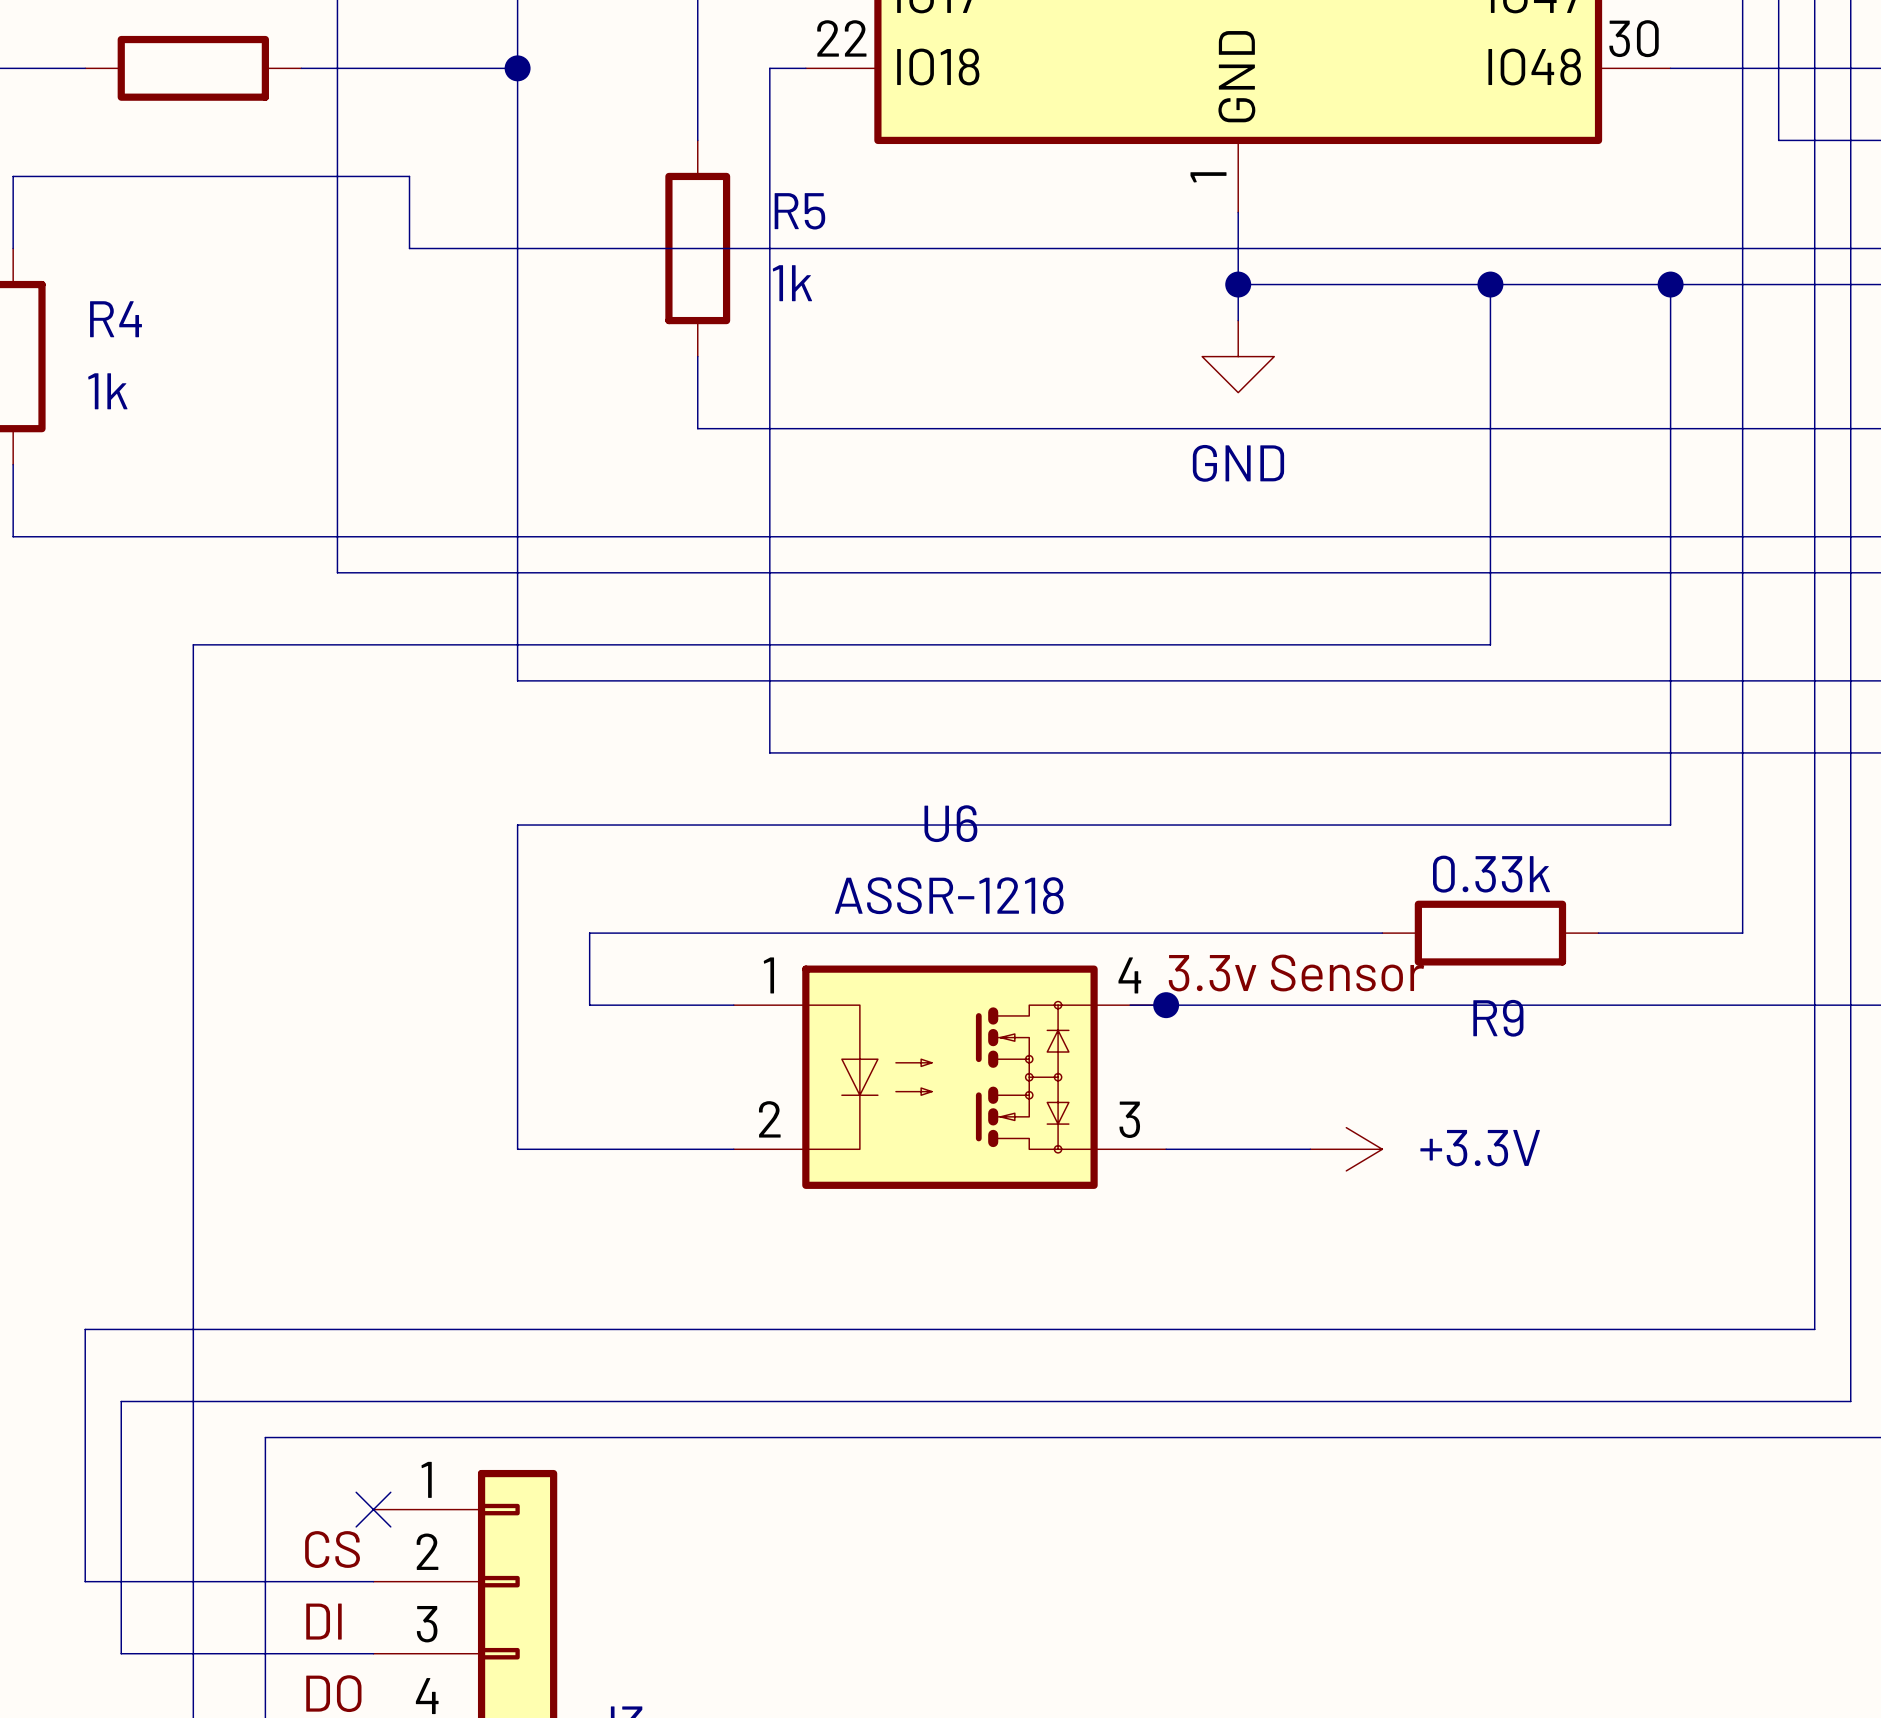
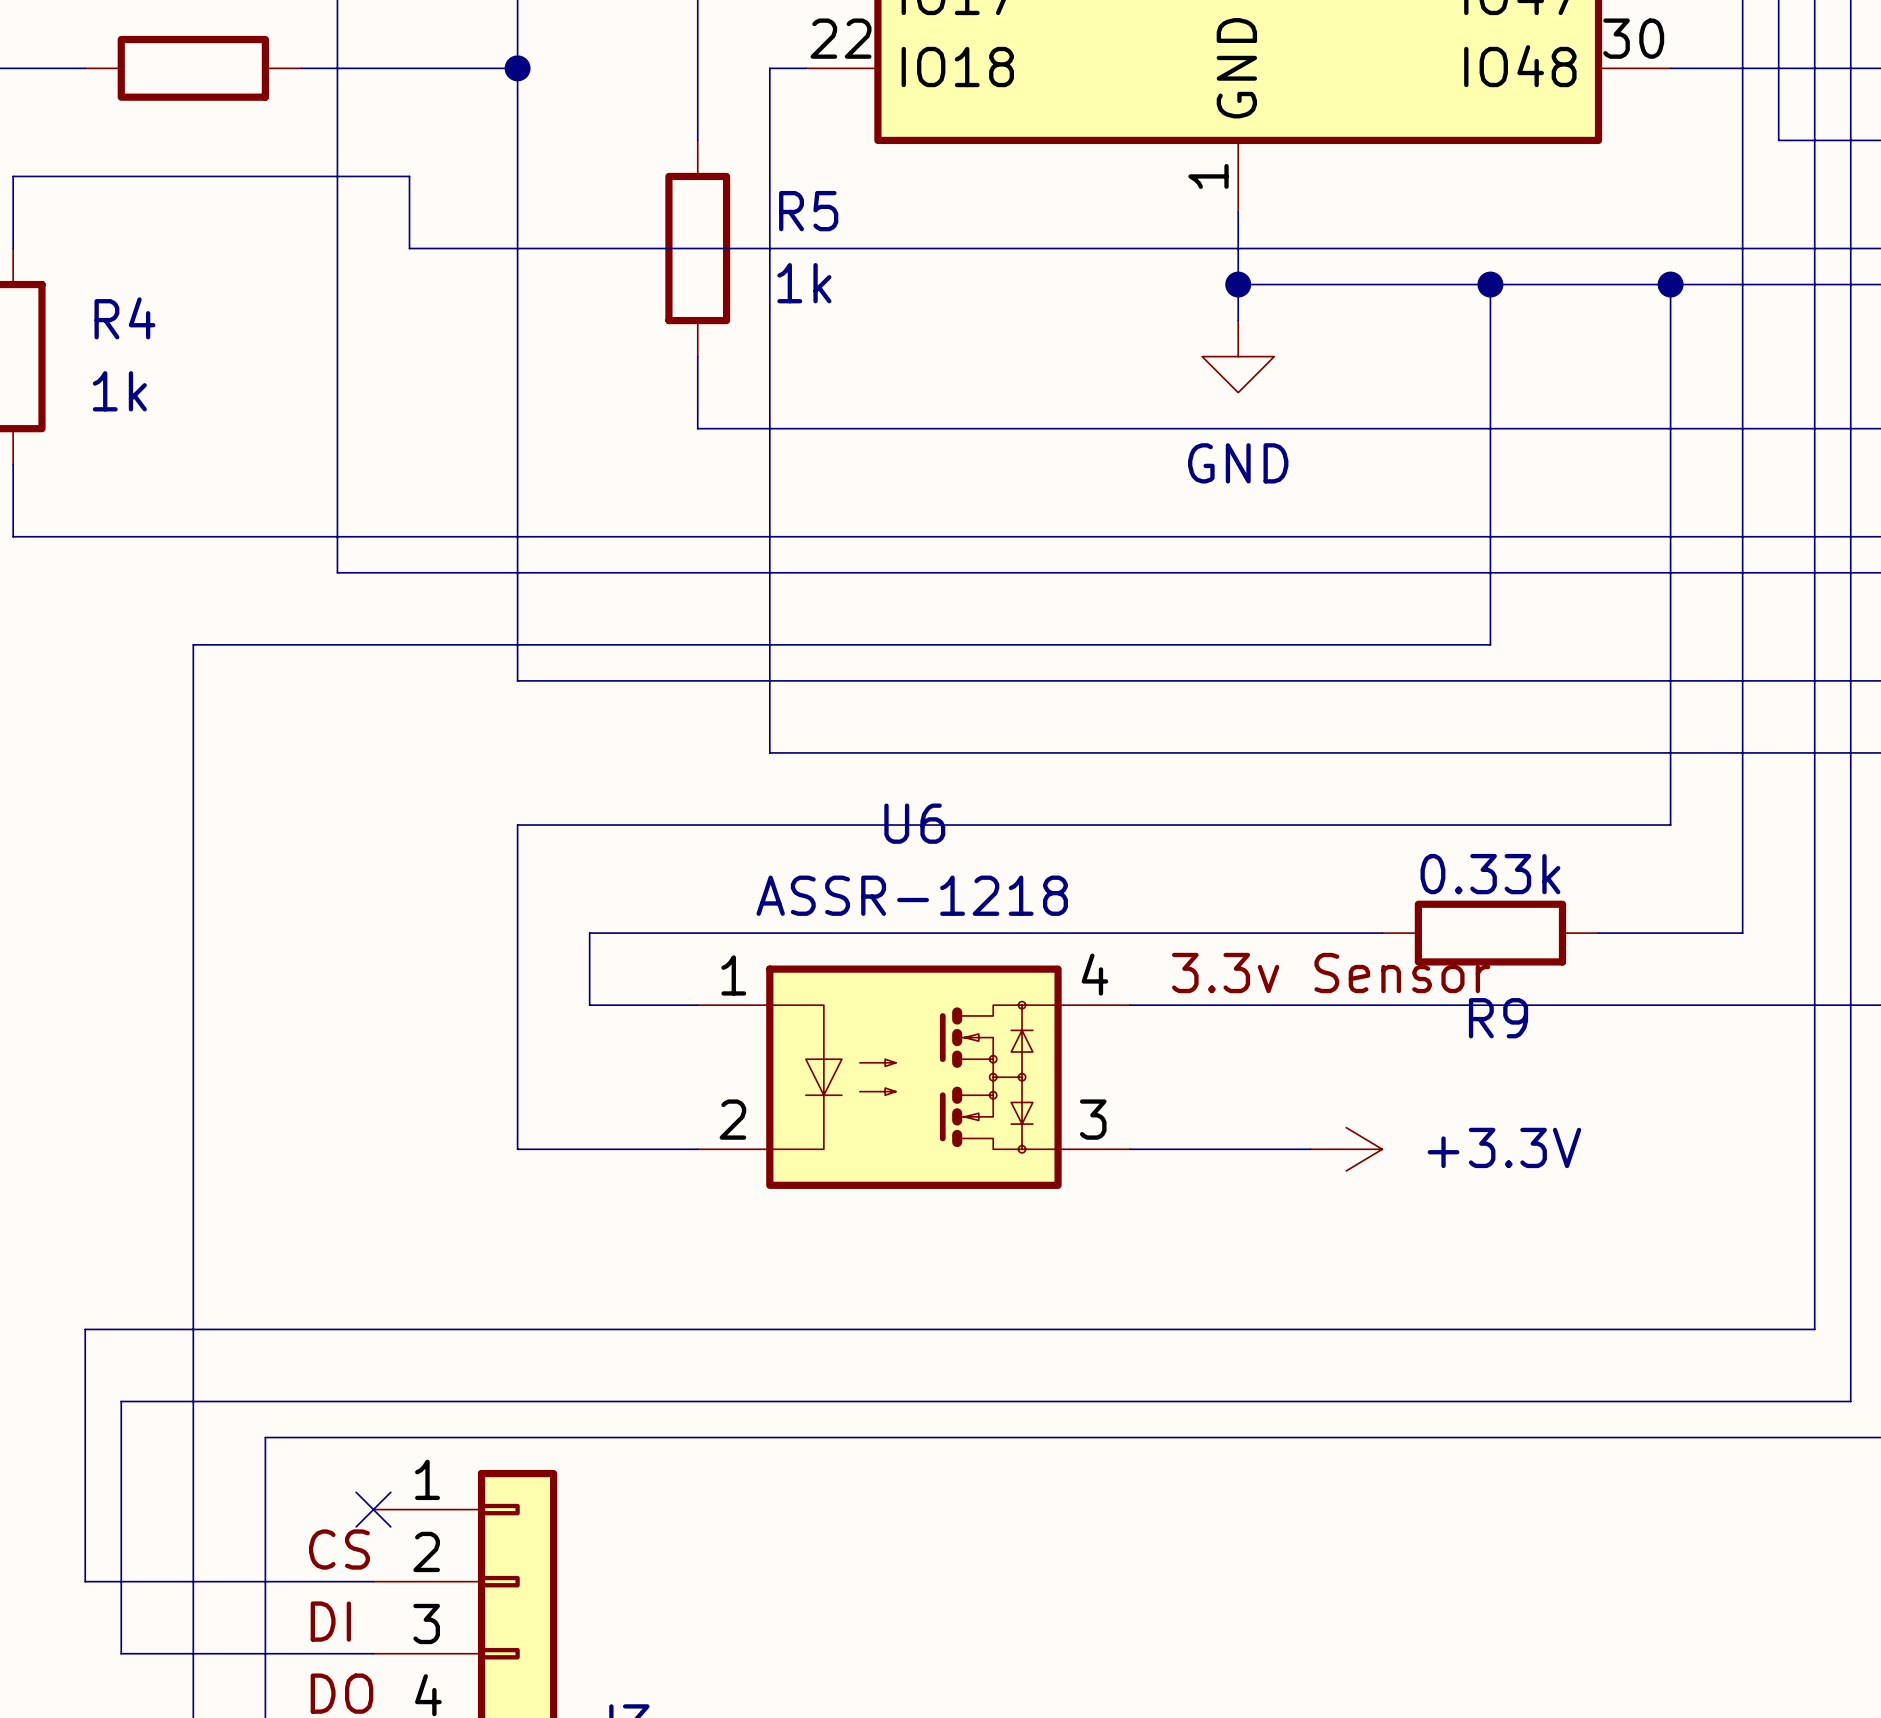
junction: (1166, 1005) -> none
U6 position: (949, 1077) -> (913, 1077)

